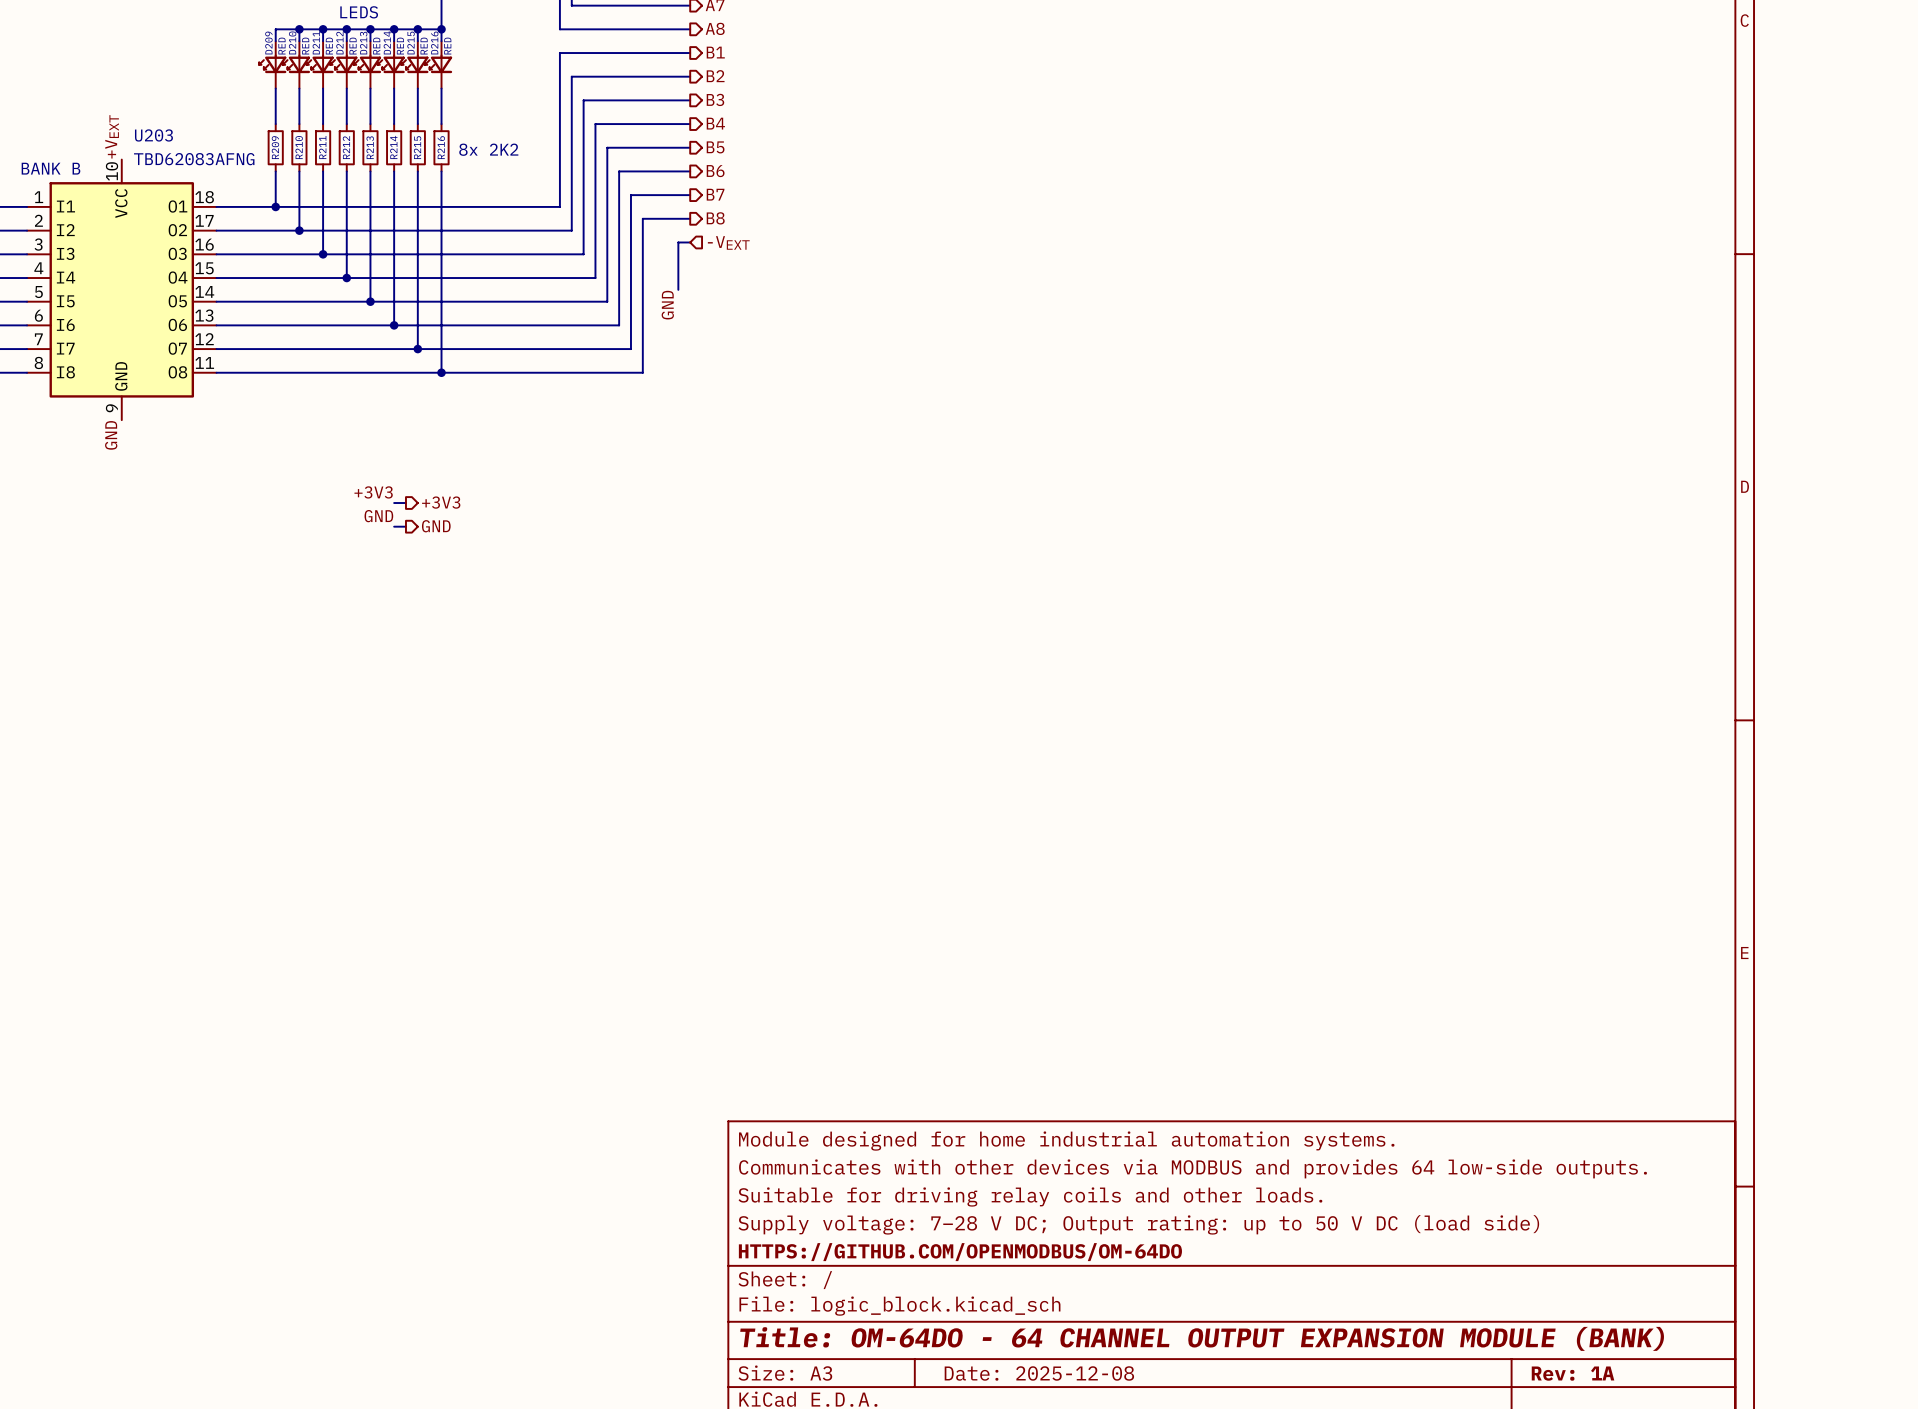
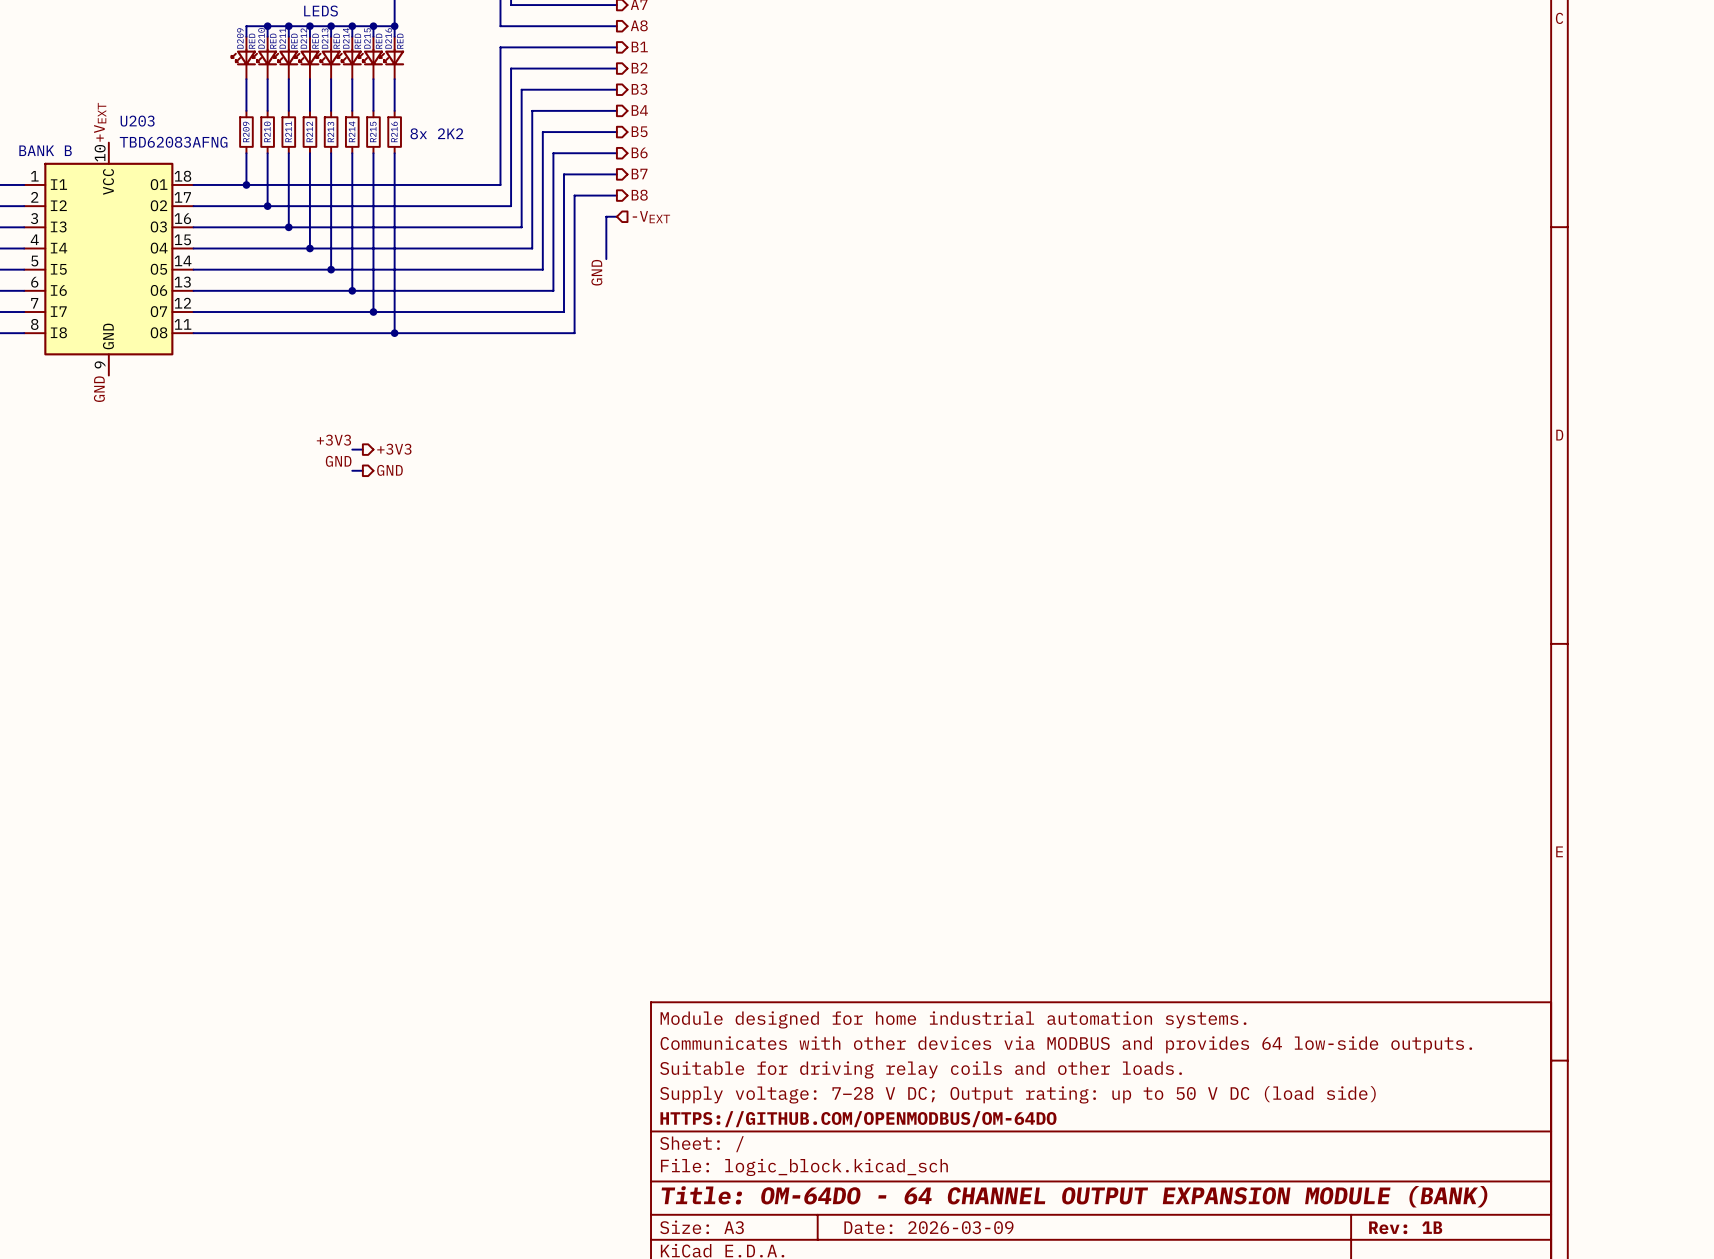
title block: Date: 2025-12-08 (1039, 1373) -> Date: 2026-03-09 (928, 1227)
title block: Rev: 1A (1573, 1373) -> Rev: 1B (1405, 1227)

